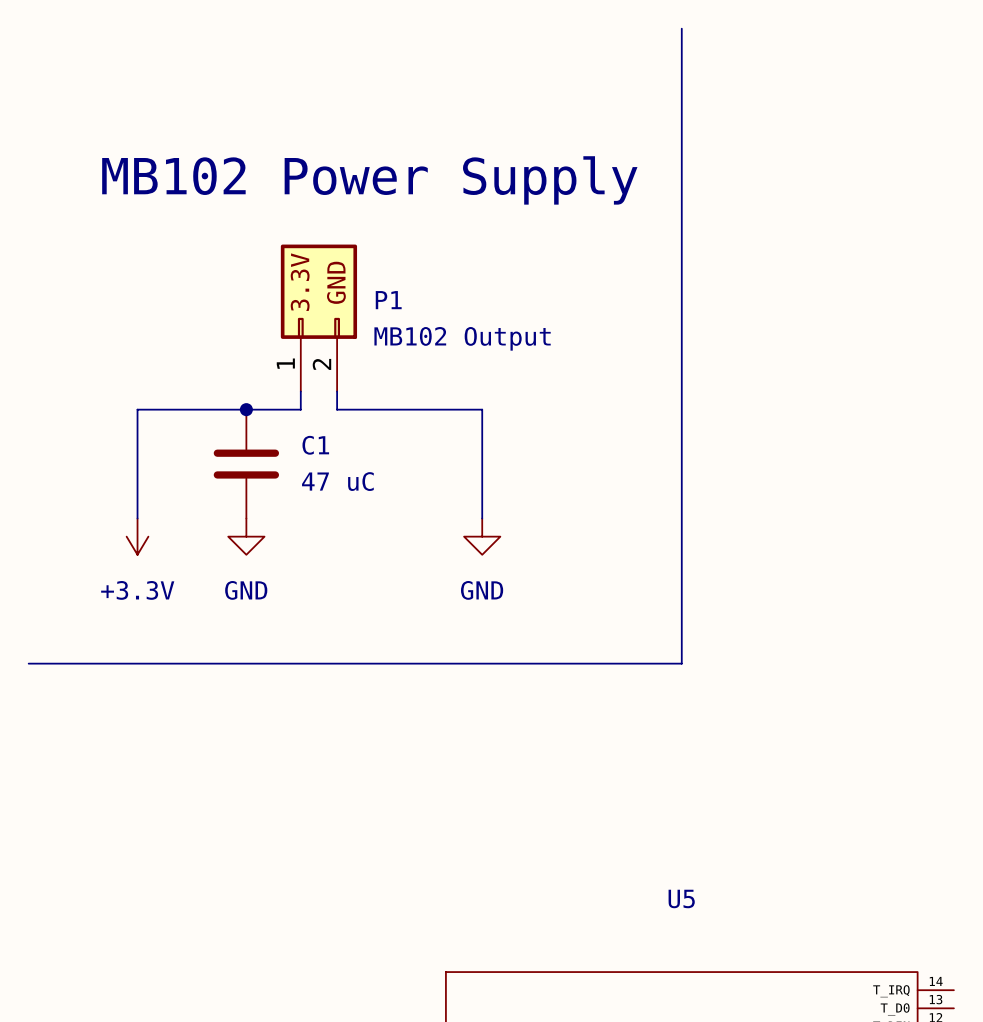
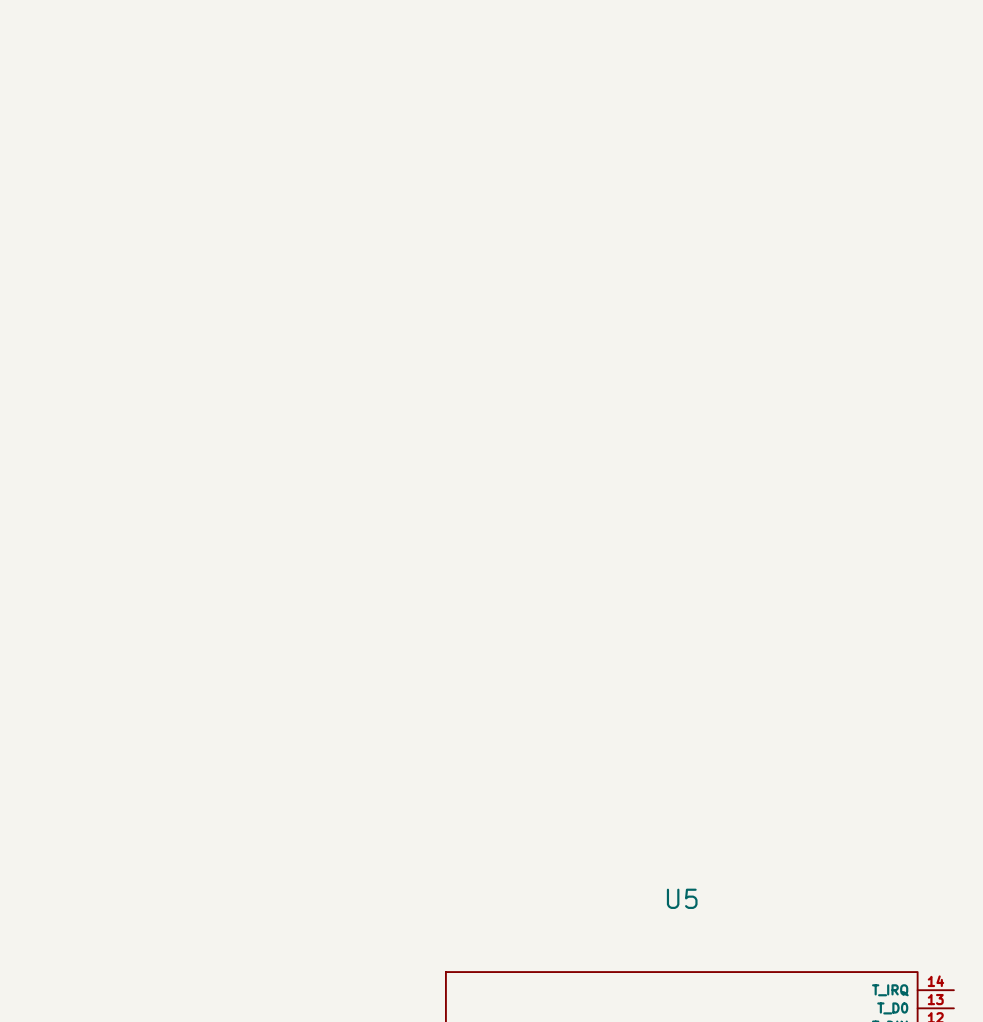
line: (681, 28) (681, 663) (28, 663) -> none
text: MB102 Power Supply (369, 180) -> none
P1: MB102 Output (318, 318) -> none
wire: (300, 391) (300, 409) (137, 409) (137, 518) -> none
wire: (337, 391) (337, 409) (482, 409) (482, 518) -> none
junction: (246, 409) -> none
C1: 47 uC (246, 464) -> none
power symbol: +3.3V (137, 536) -> none
power symbol: GND (246, 536) -> none
power symbol: GND (482, 536) -> none

